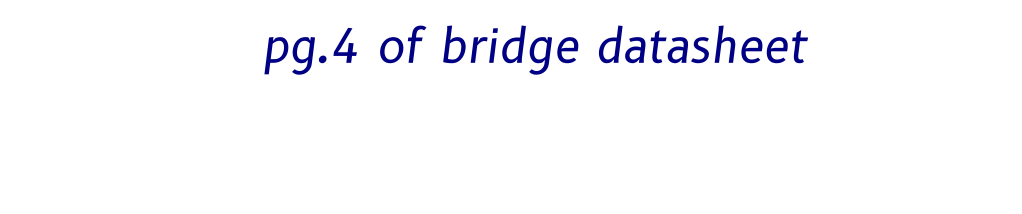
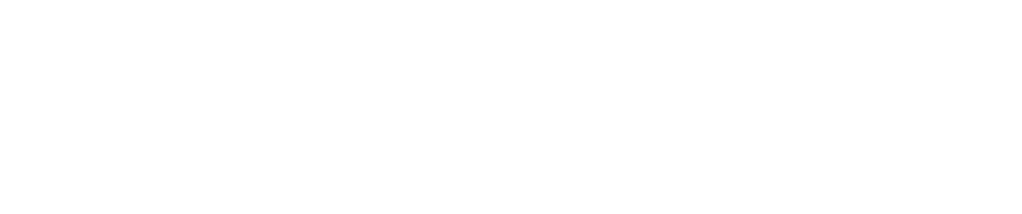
text: pg.4 of bridge datasheet (536, 50) -> none

